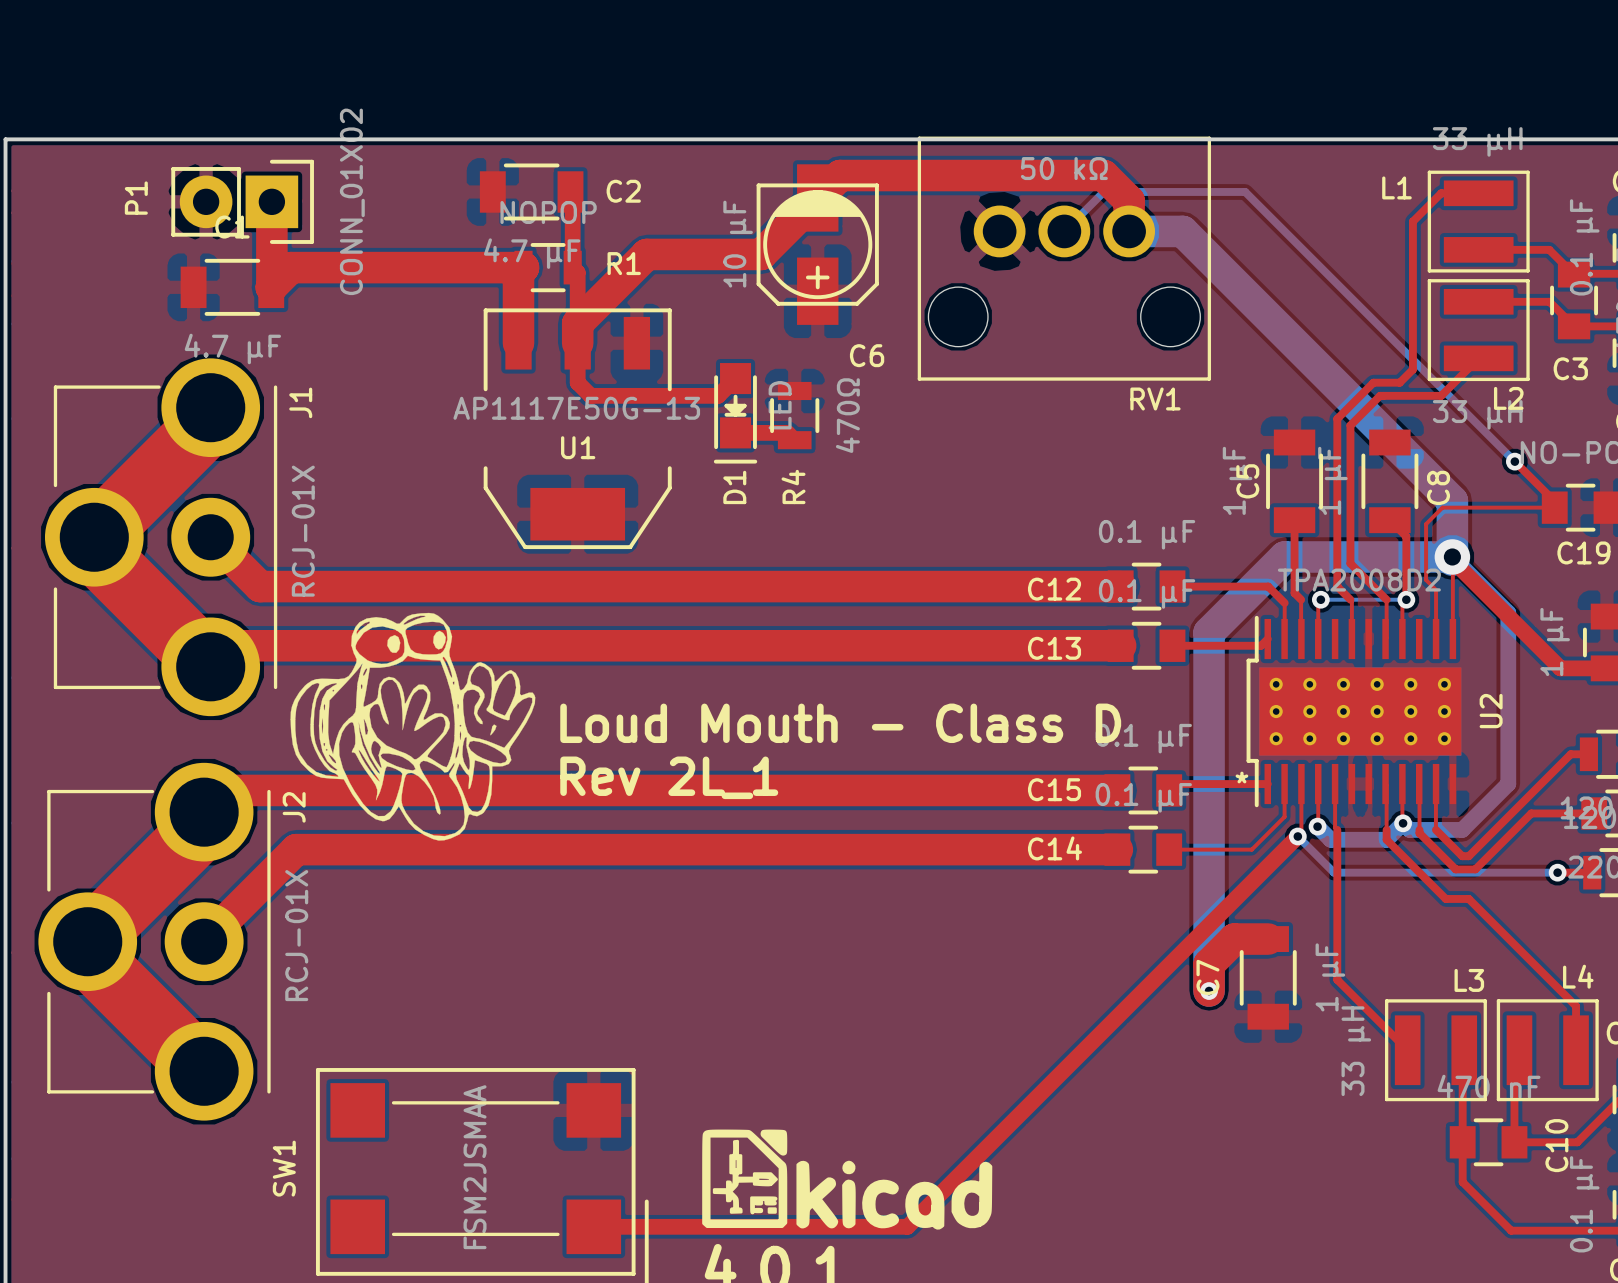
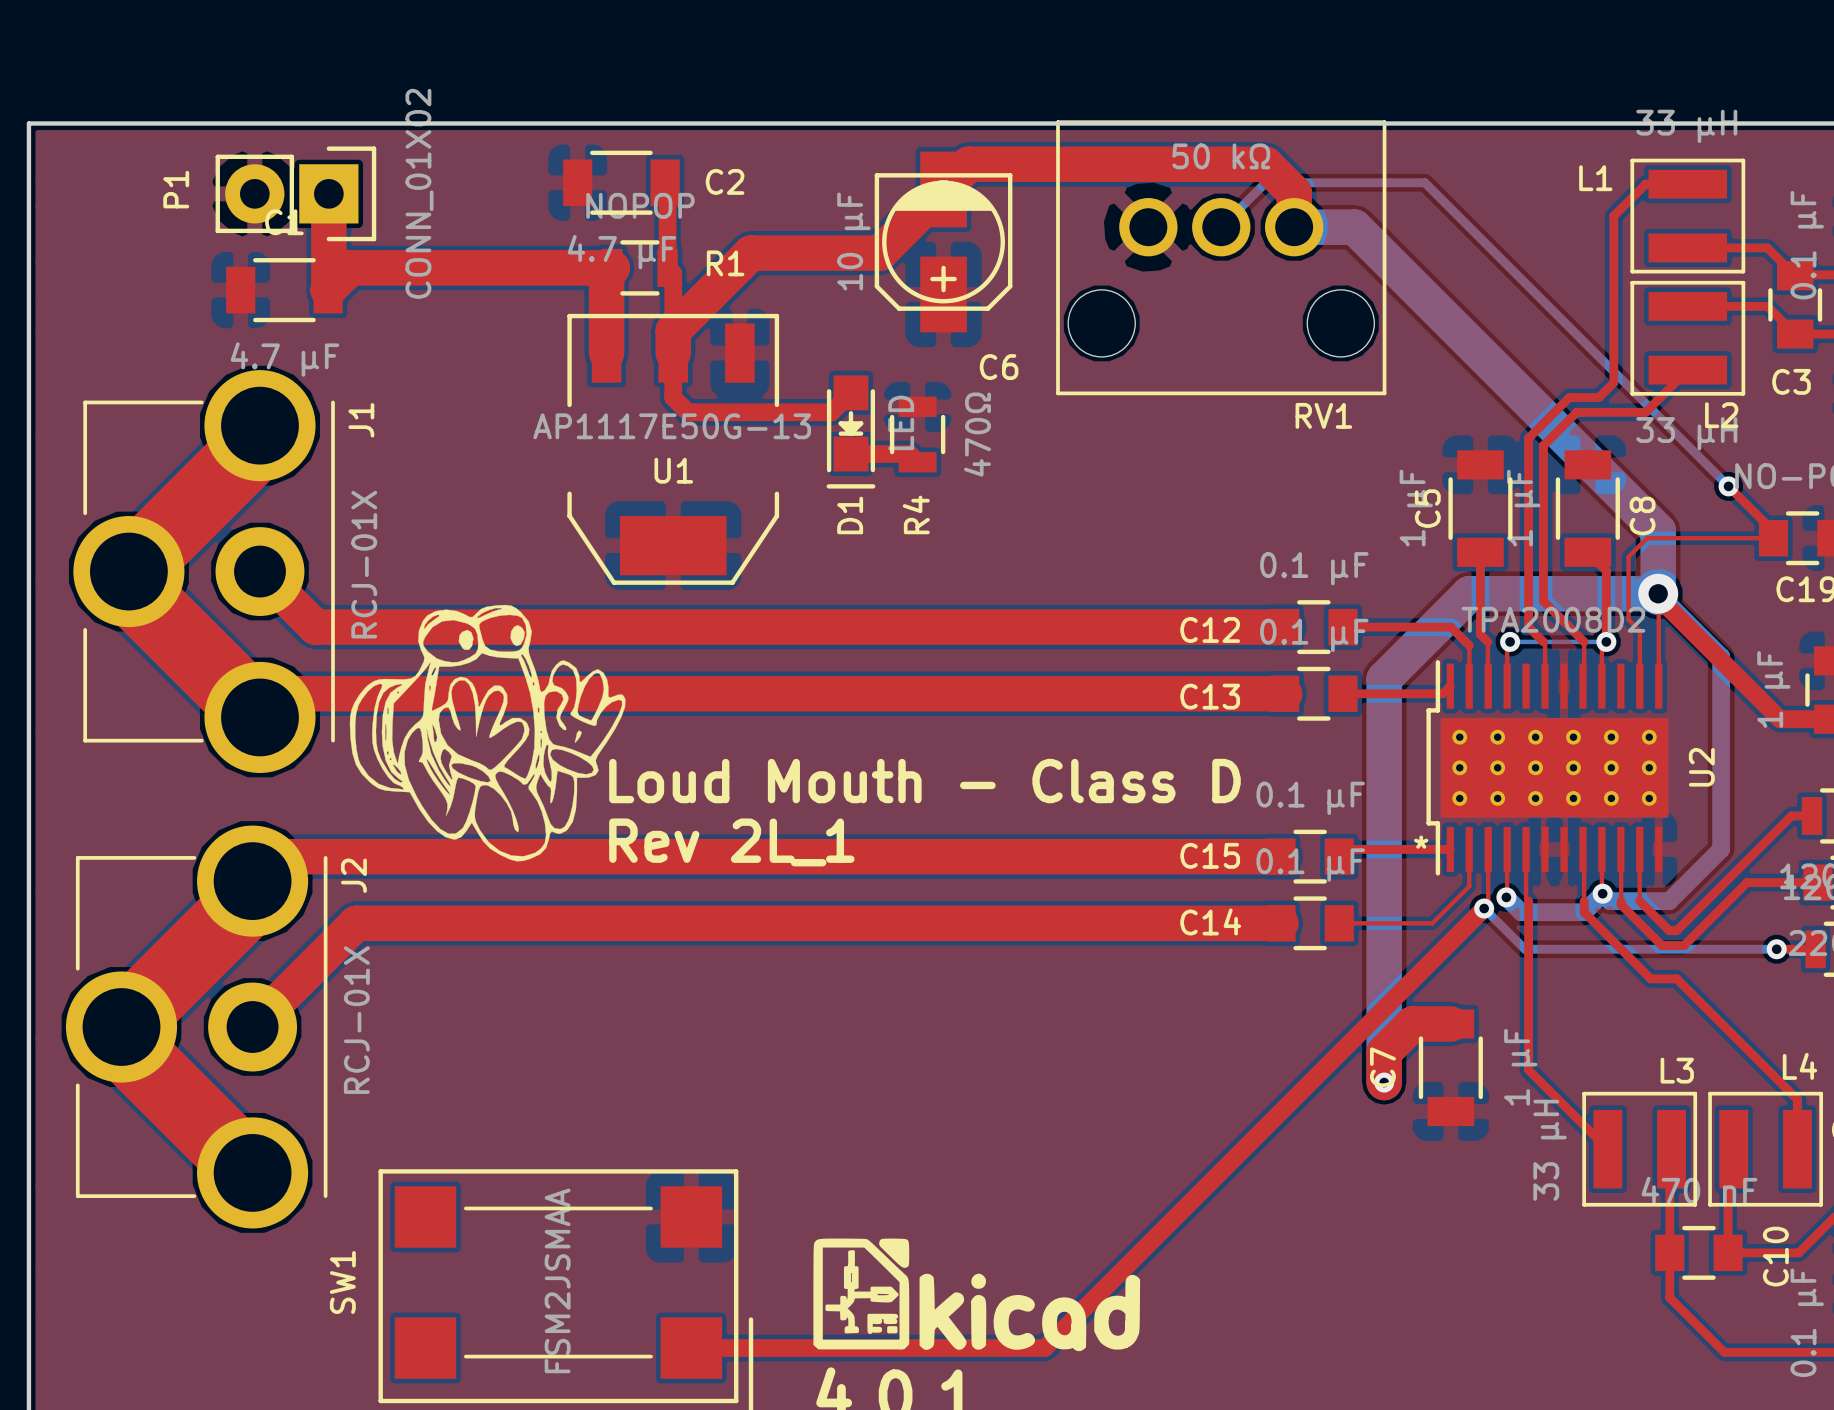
text position: Loud Mouth - Class D (840, 723) -> Loud Mouth - Class D (924, 781)
drawing position: (412, 726) -> (487, 733)
text position: Rev 2L_1 (669, 777) -> Rev 2L_1 (731, 842)

